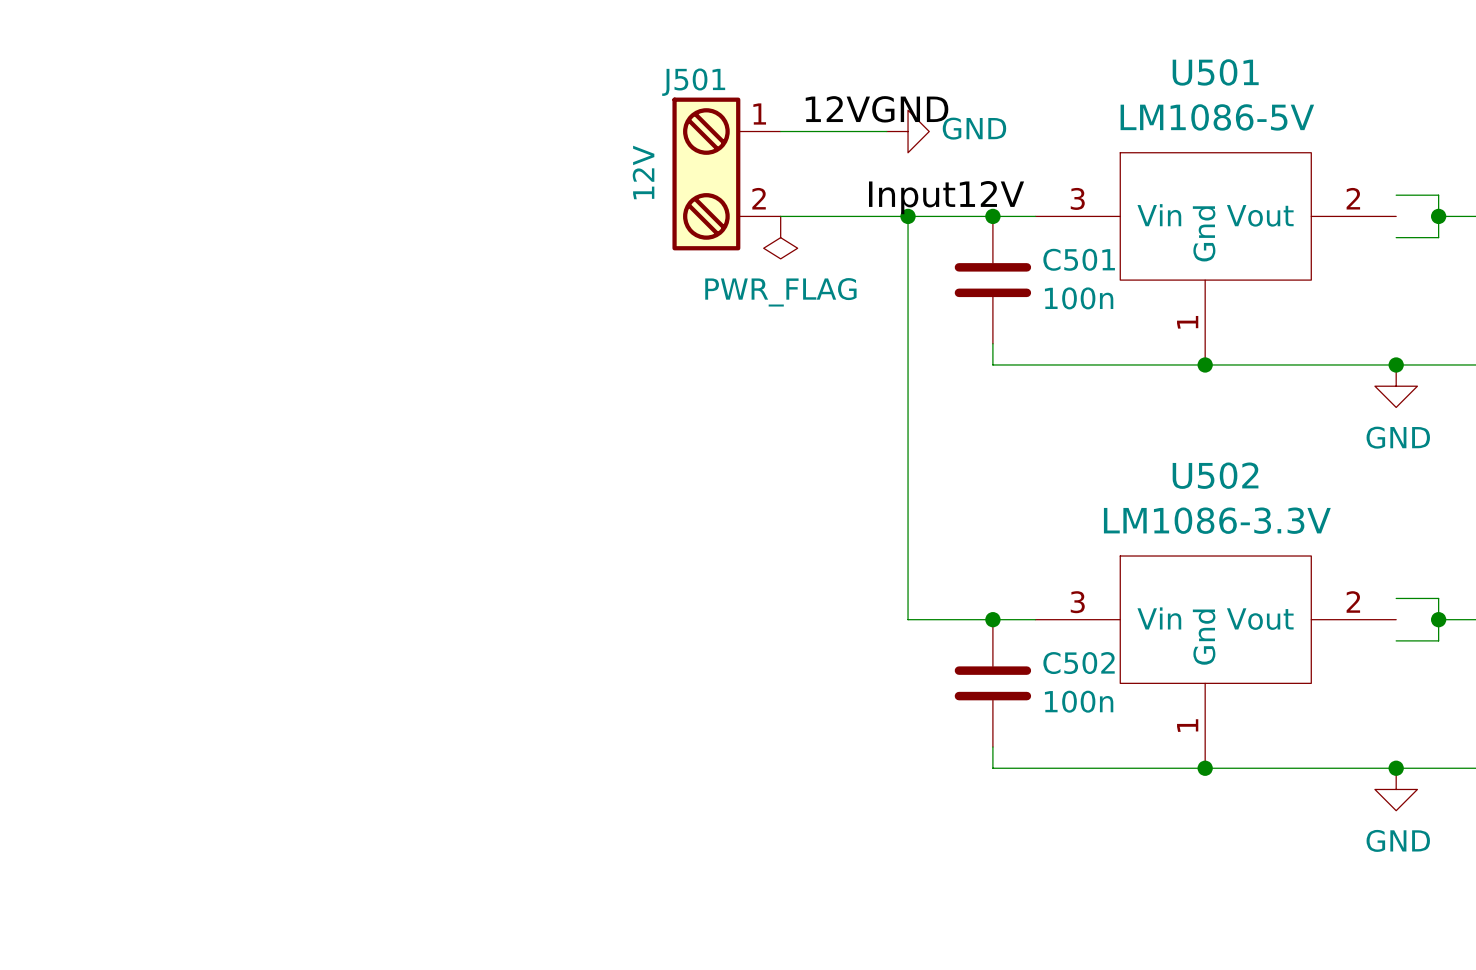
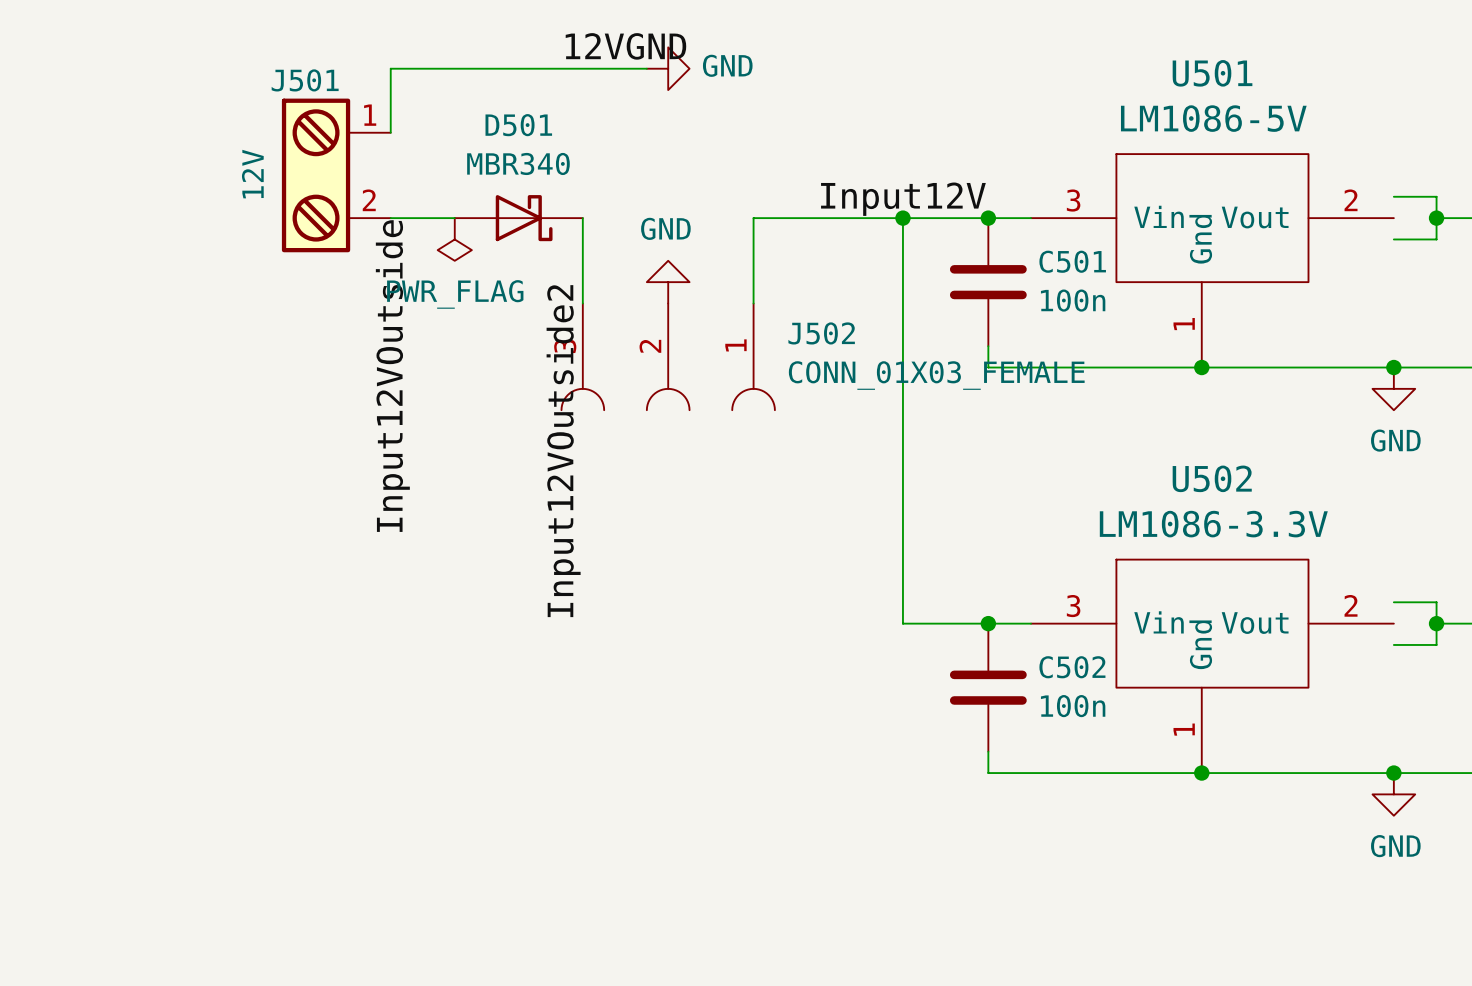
wire: none -> (646, 68) (390, 68) (390, 132)
power symbol: none -> GND (668, 68)
label position: 12VGND (877, 109) -> 12VGND (625, 46)
wire: (780, 131) (886, 131) -> none
power symbol: GND (908, 131) -> none
J501 position: (726, 173) -> (336, 175)
label position: Input12V (946, 197) -> Input12V (903, 199)
wire: none -> (390, 218) (454, 218)
D501: none -> MBR340 (518, 218)
wire: none -> (582, 218) (582, 303)
wire: none -> (774, 218) (753, 218) (753, 303)
power symbol position: PWR_FLAG (780, 237) -> PWR_FLAG (454, 239)
power symbol: none -> GND (668, 282)
J502: none -> CONN_01X03_FEMALE (668, 356)
label: none -> Input12VOutside (392, 376)
label: none -> Input12VOutside2 (563, 451)

